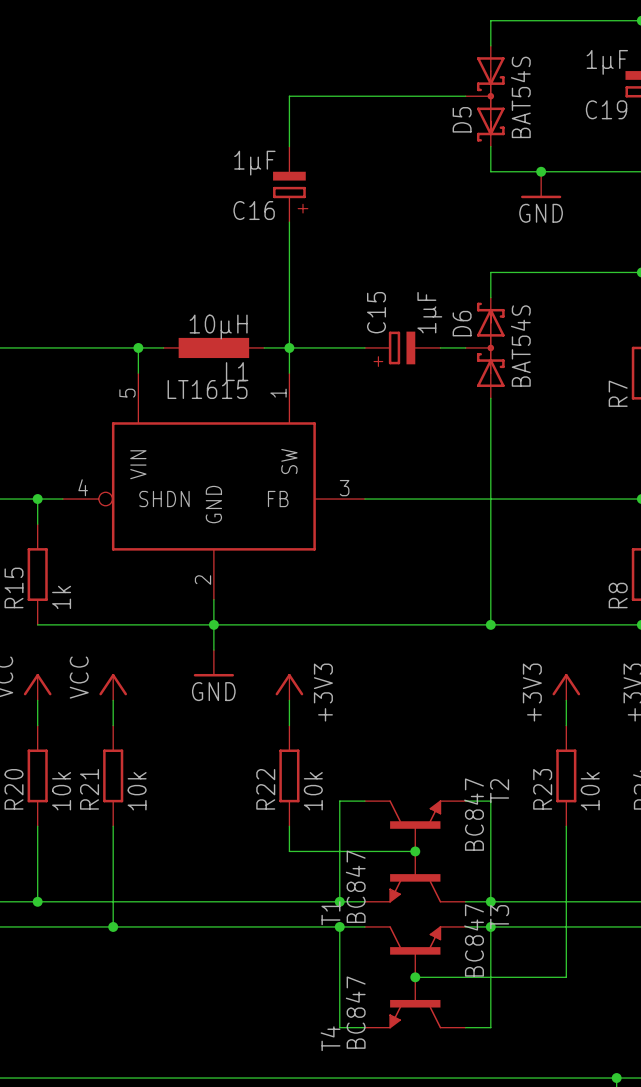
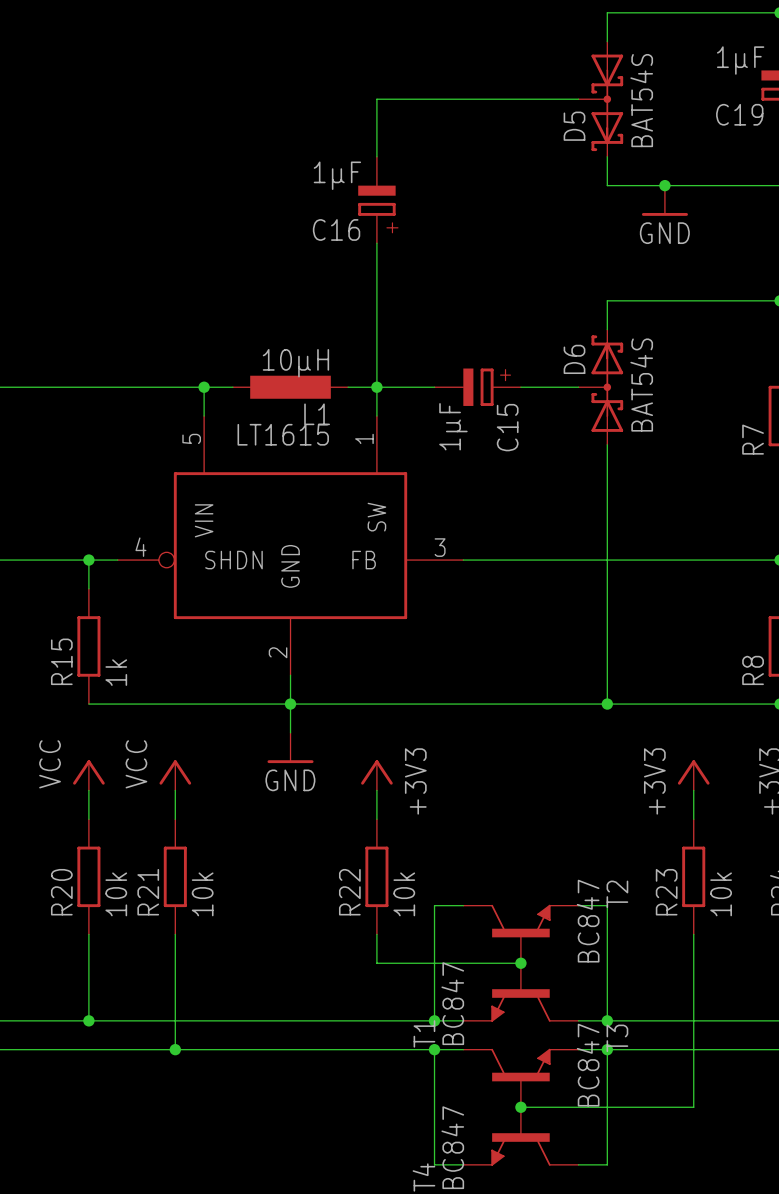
C15 name position: C15 (376, 312) -> C15 (507, 427)
C15 value position: 1µF (429, 312) -> 1µF (453, 426)
C15 symbol: [364, 331, 441, 365] -> [434, 368, 521, 406]

